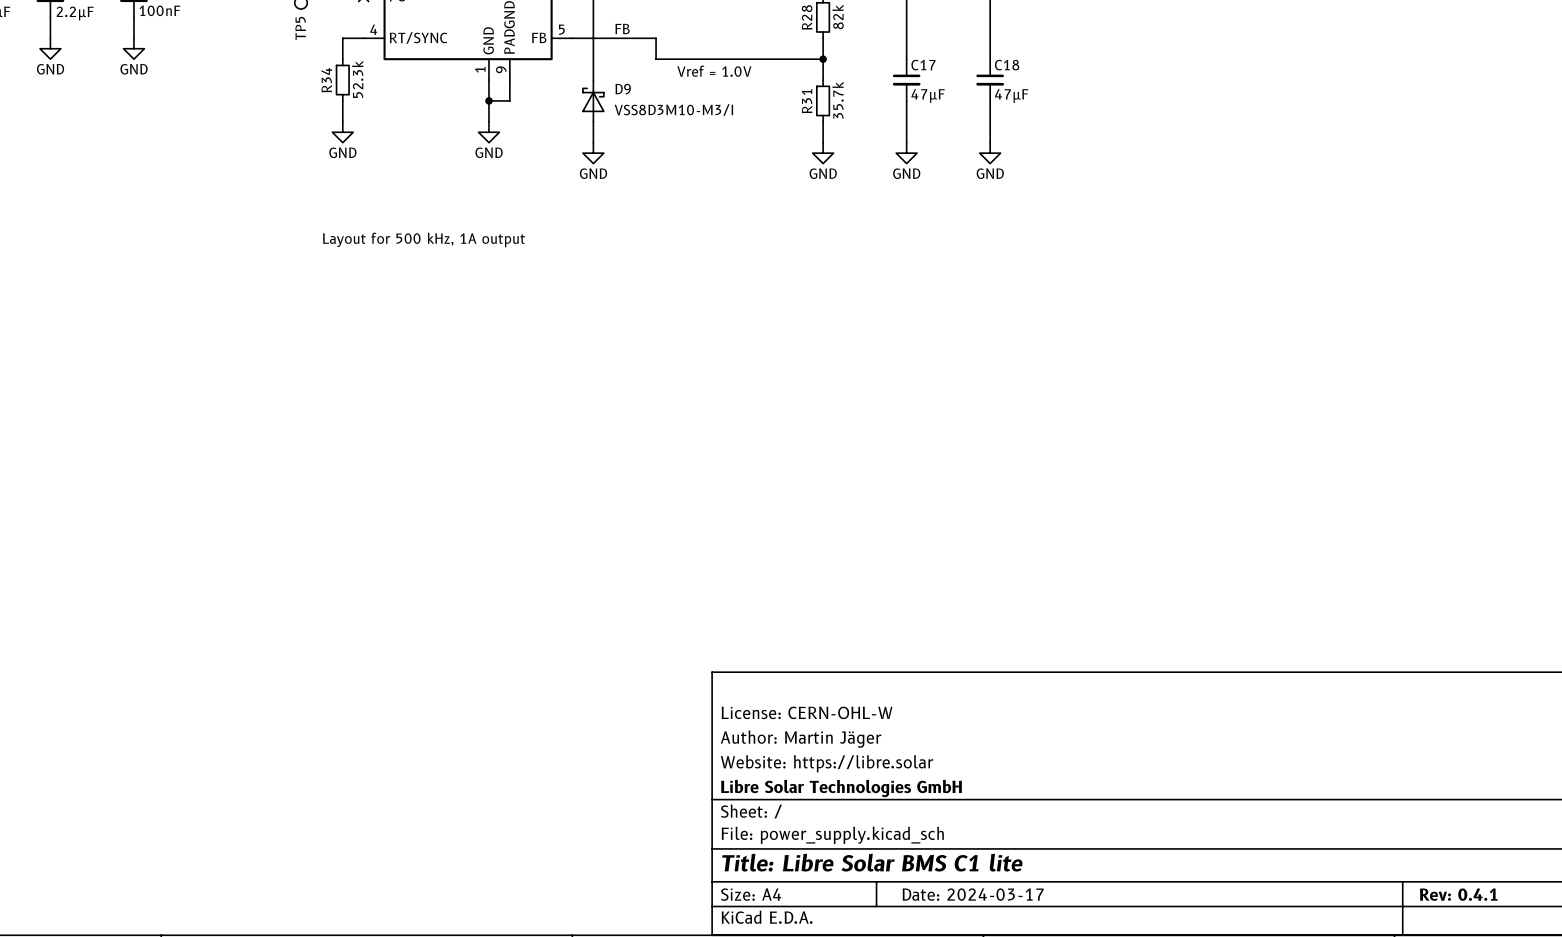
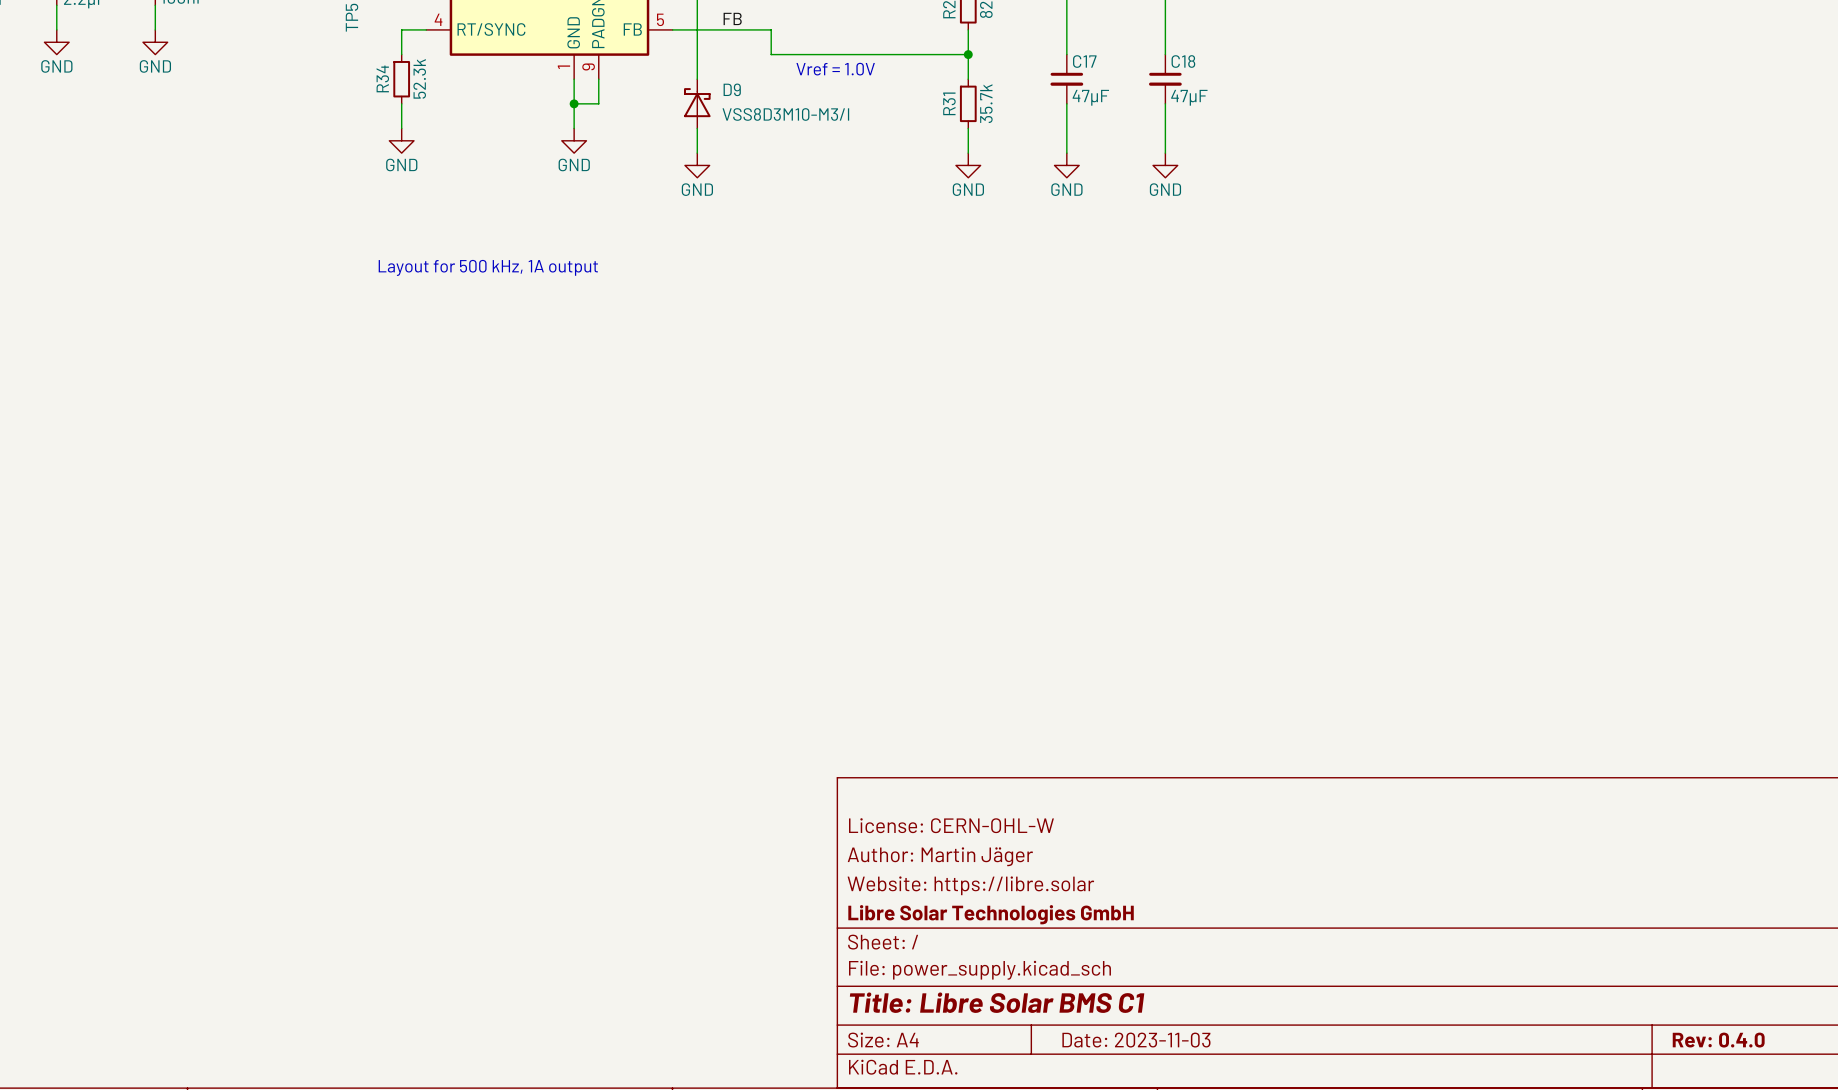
title block: Title: Libre Solar BMS C1 lite (872, 862) -> Title: Libre Solar BMS C1 (997, 1002)
title block: Date: 2024-03-17 (973, 894) -> Date: 2023-11-03 (1136, 1040)
title block: Rev: 0.4.1 (1458, 894) -> Rev: 0.4.0 (1718, 1040)

